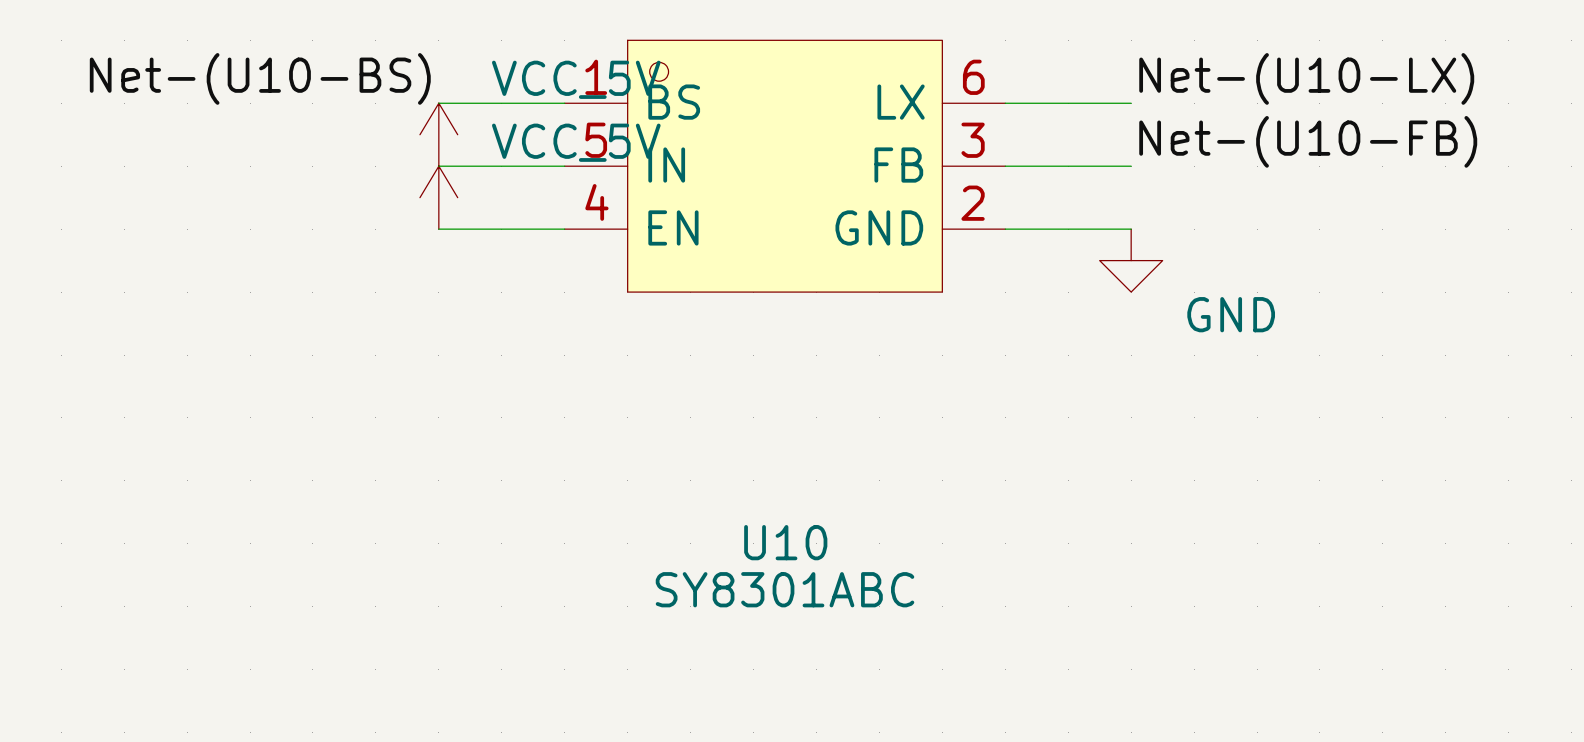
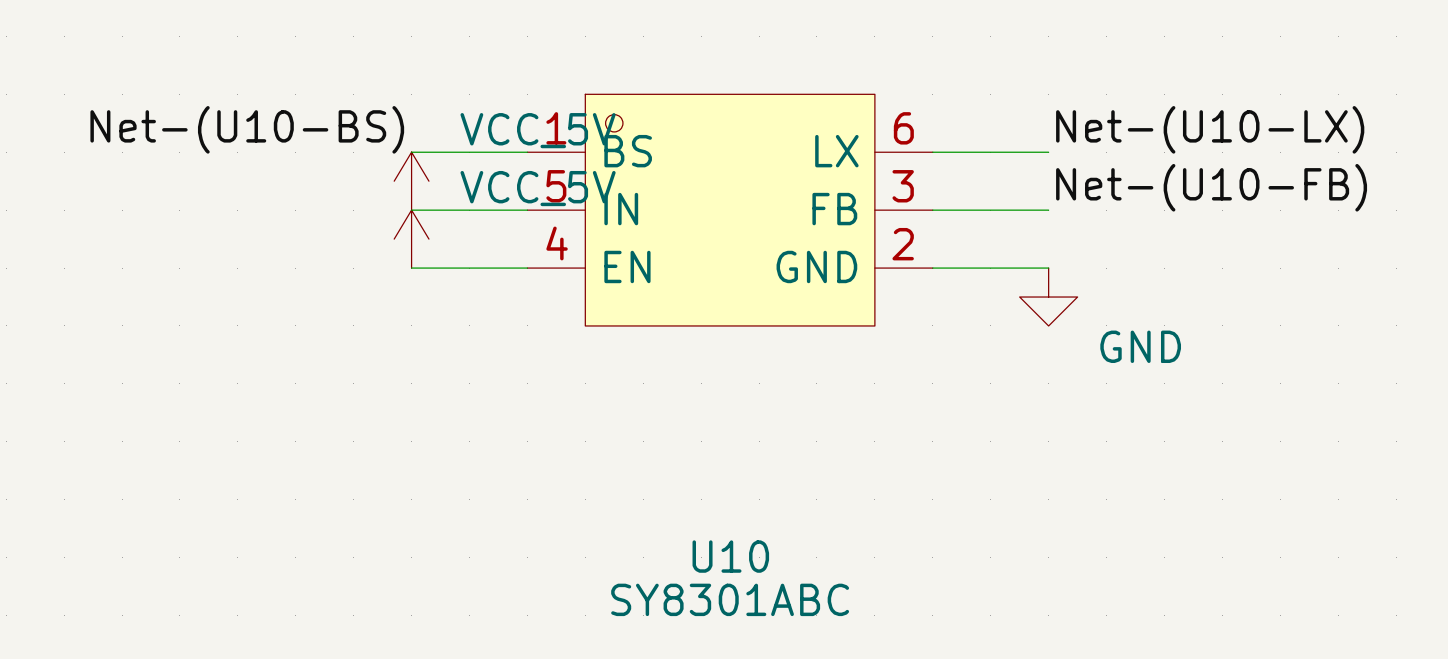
label position: Net-(U10-BS) (260, 78) -> Net-(U10-BS) (247, 129)
label: Net-(U10-LX) (1306, 78) -> none
wire: (438, 103) (564, 103) -> (411, 268) (527, 268)
wire: (1005, 103) (1131, 103) -> (932, 268) (1048, 268)
power symbol position: VCC_5V (438, 134) -> VCC_5V (411, 239)
label: Net-(U10-FB) (1308, 141) -> Net-(U10-LX) (1210, 129)
U10 position: (785, 166) -> (730, 210)
label: none -> Net-(U10-FB) (1211, 187)
power symbol position: GND (1131, 260) -> GND (1048, 297)

